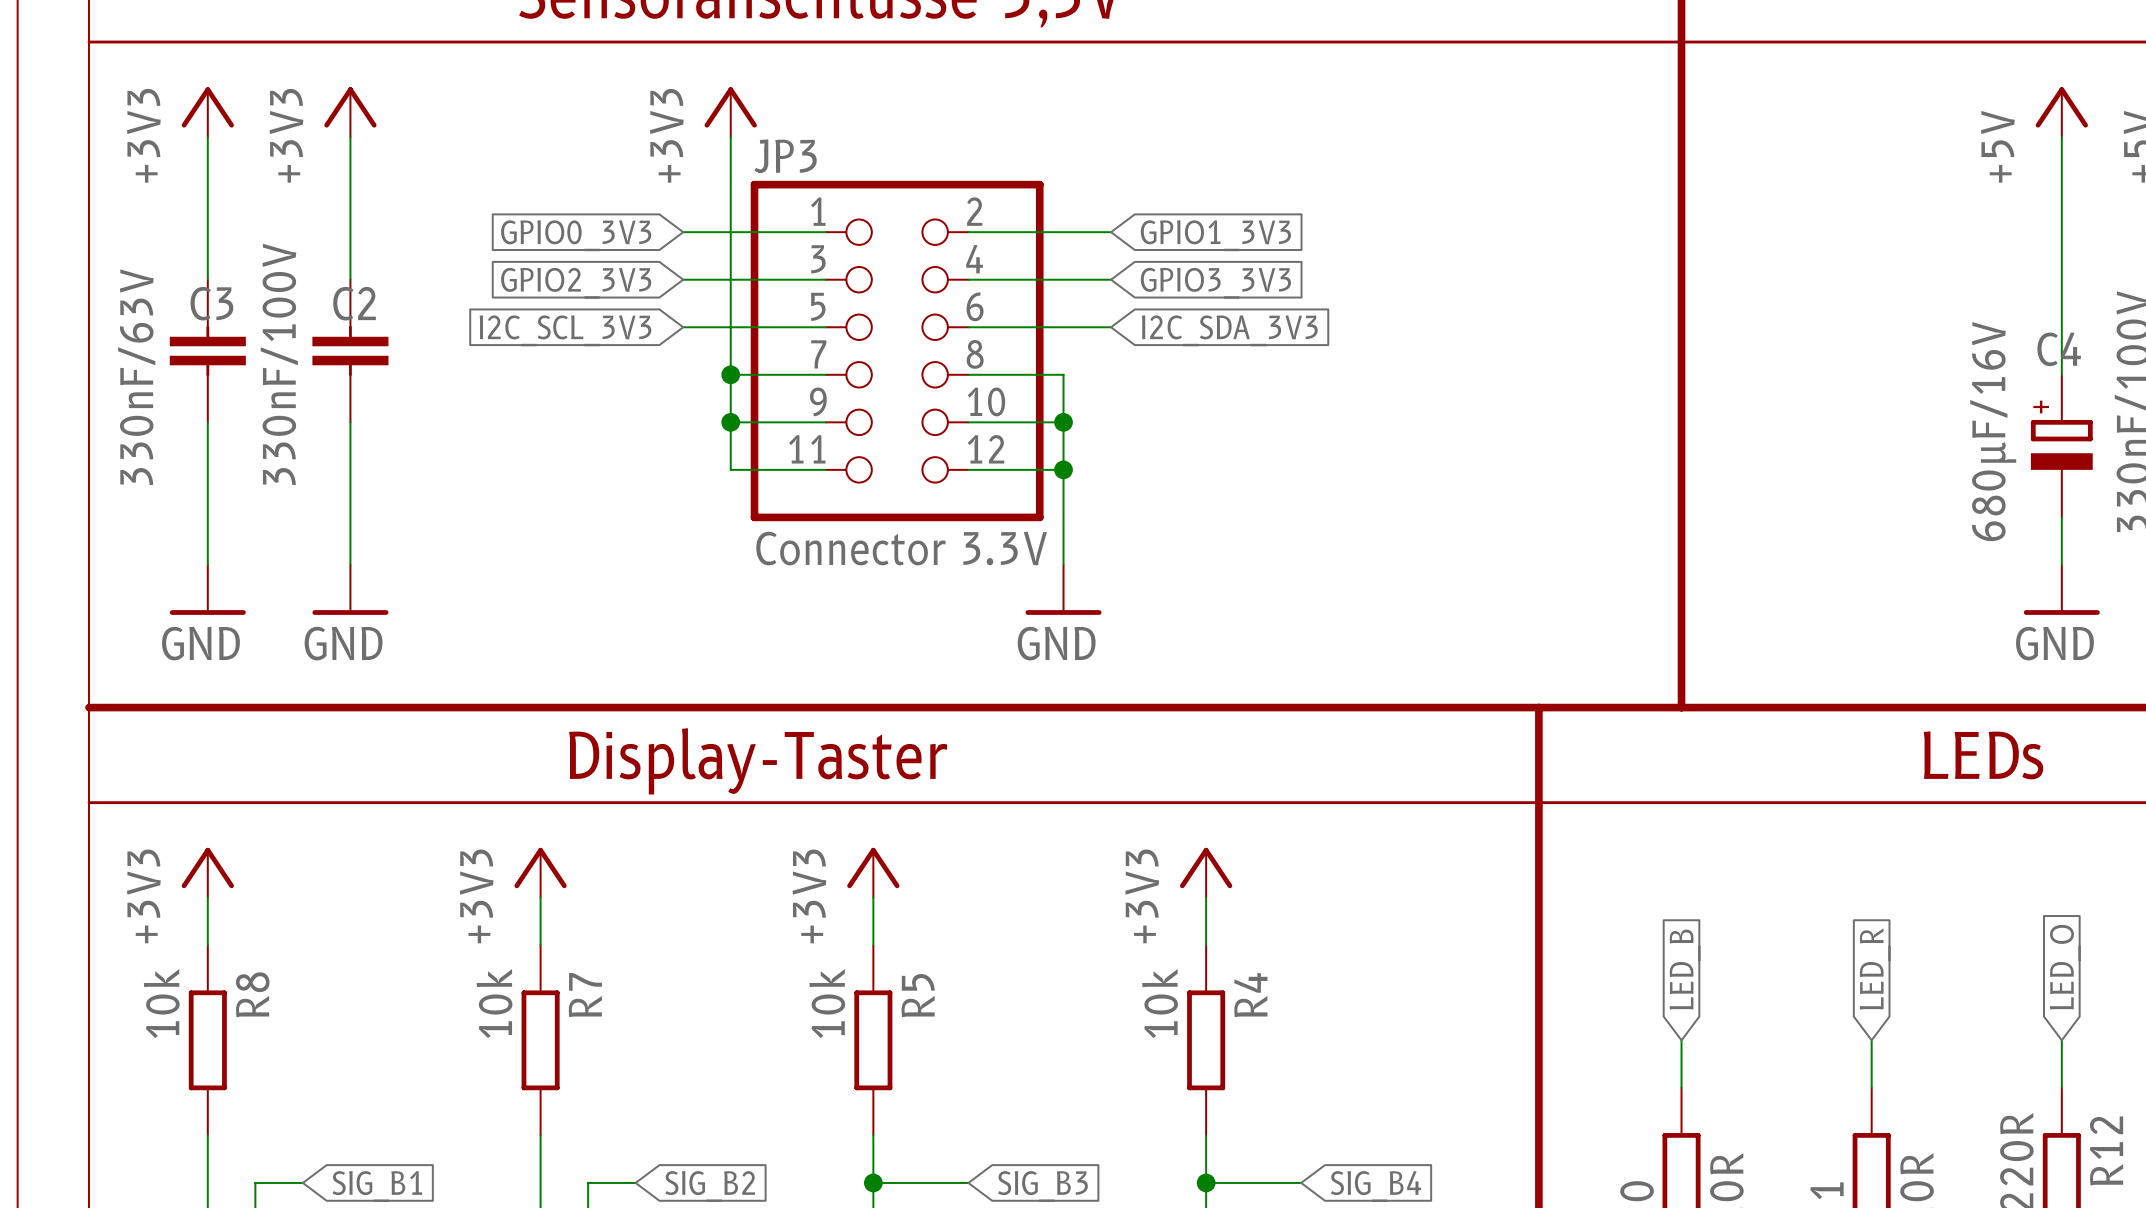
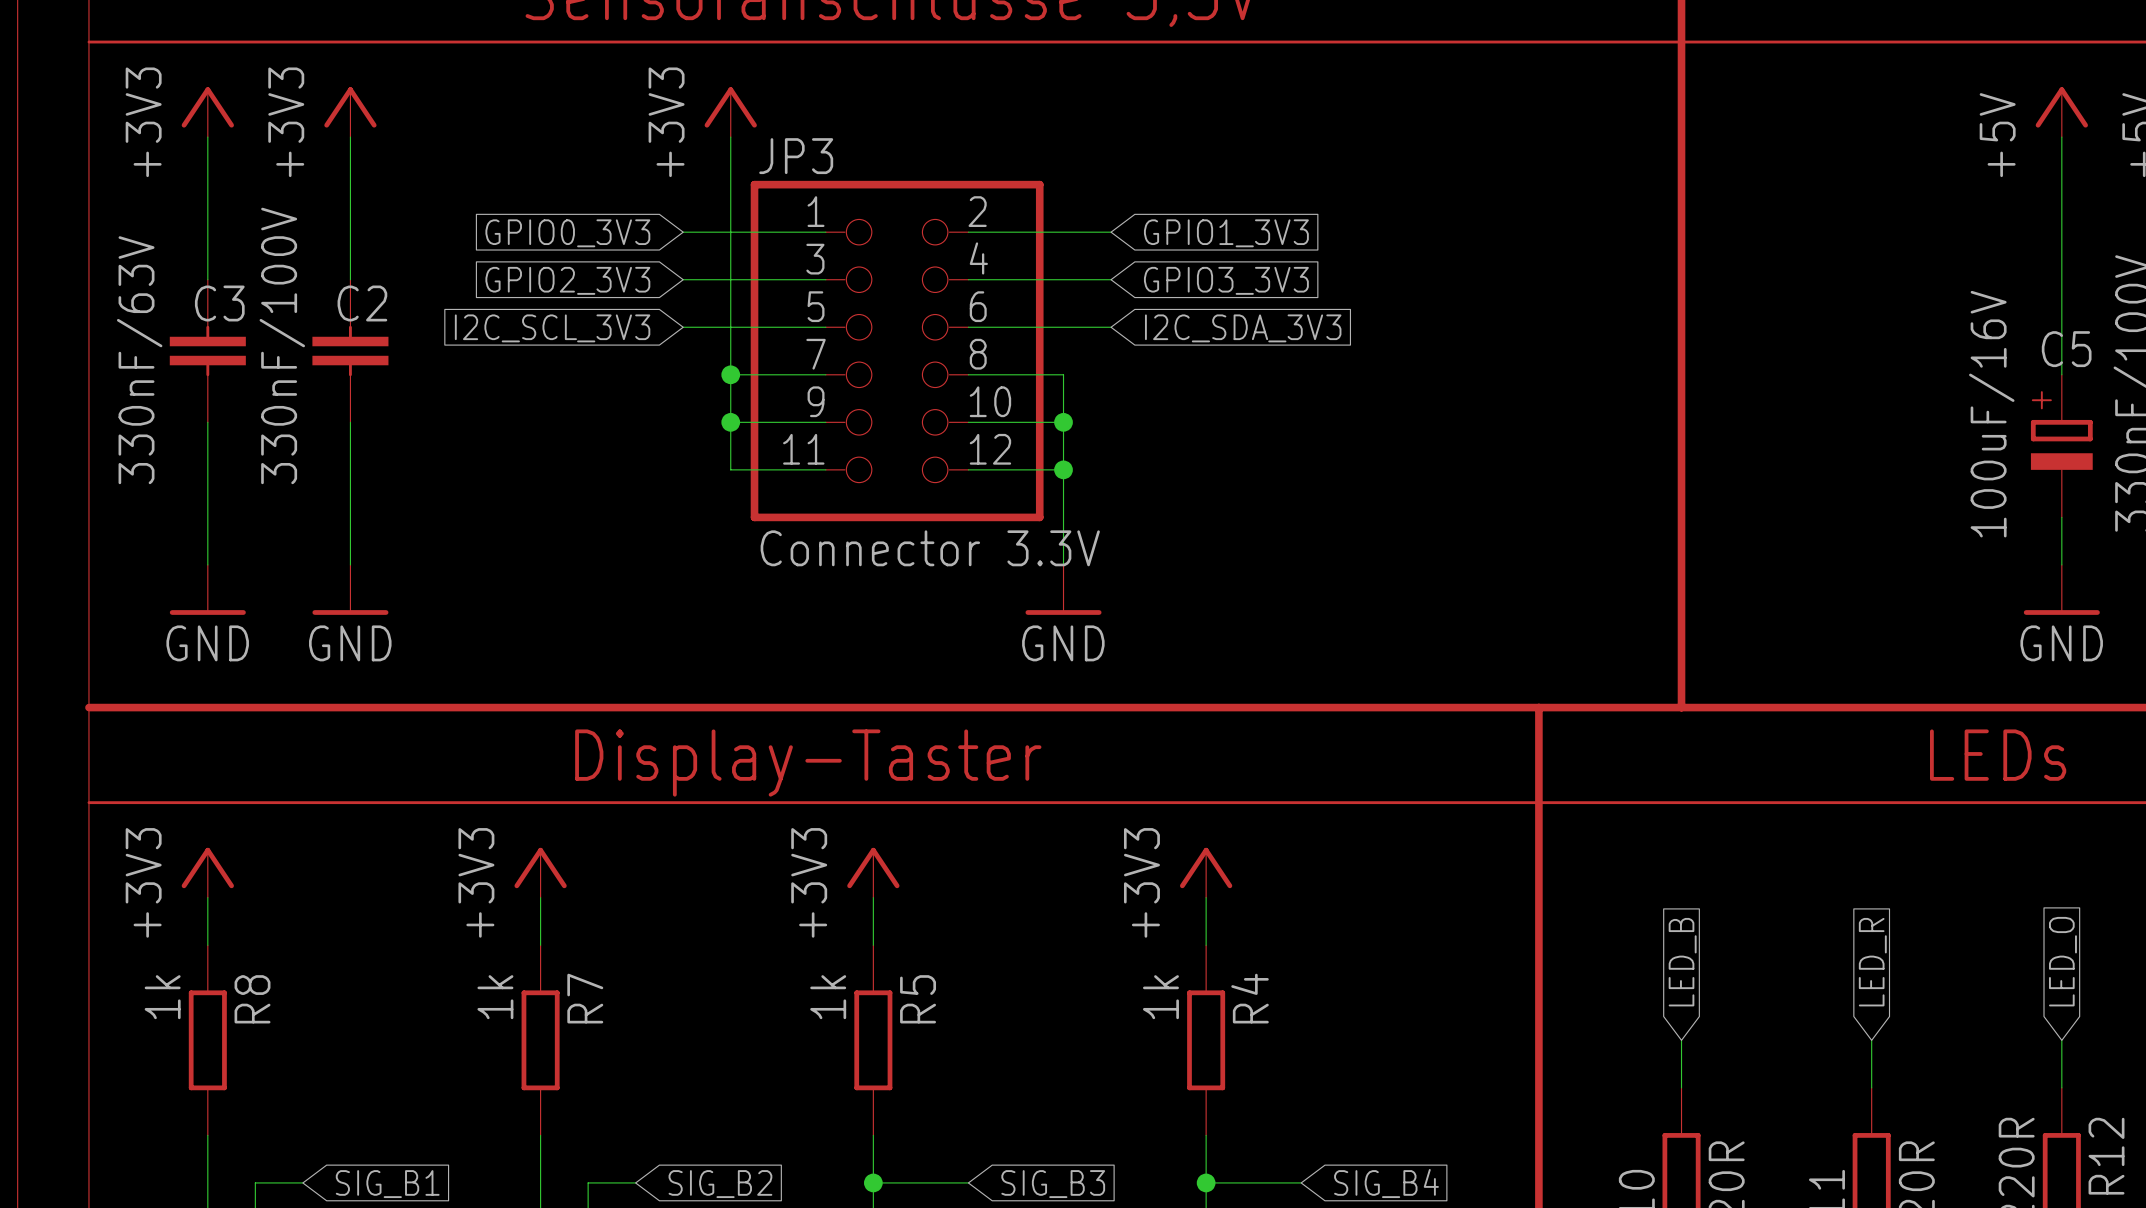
C4 name: C4 (2059, 349) -> C5 (2066, 349)
C4 value: 680µF/16V (1993, 431) -> 100uF/16V (1991, 414)
R8 value: 10k (161, 1003) -> 1k (162, 997)
R7 value: 10k (494, 1003) -> 1k (495, 997)
R5 value: 10k (827, 1003) -> 1k (828, 997)
R4 value: 10k (1160, 1003) -> 1k (1160, 997)

